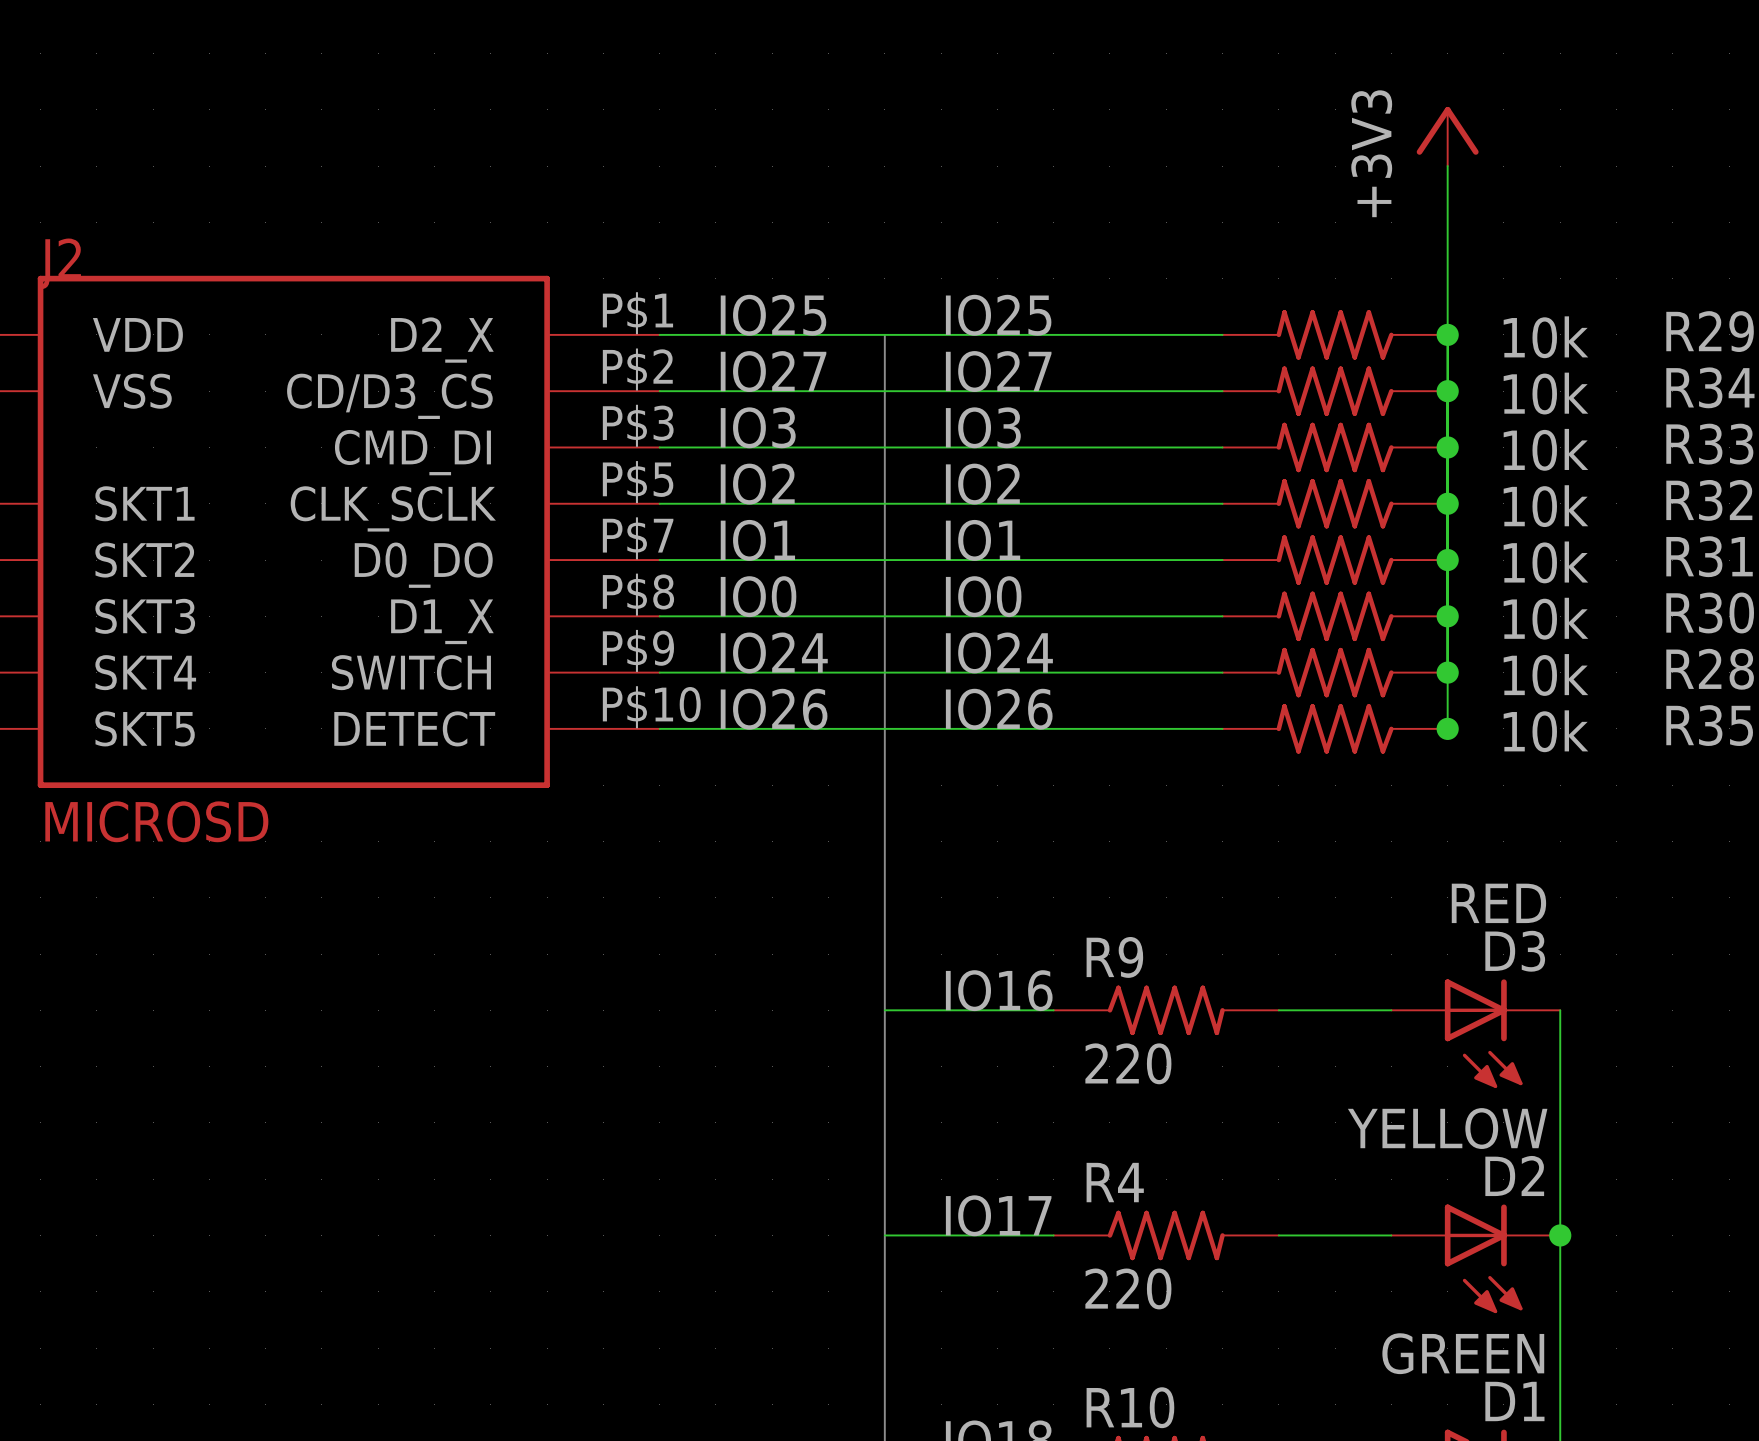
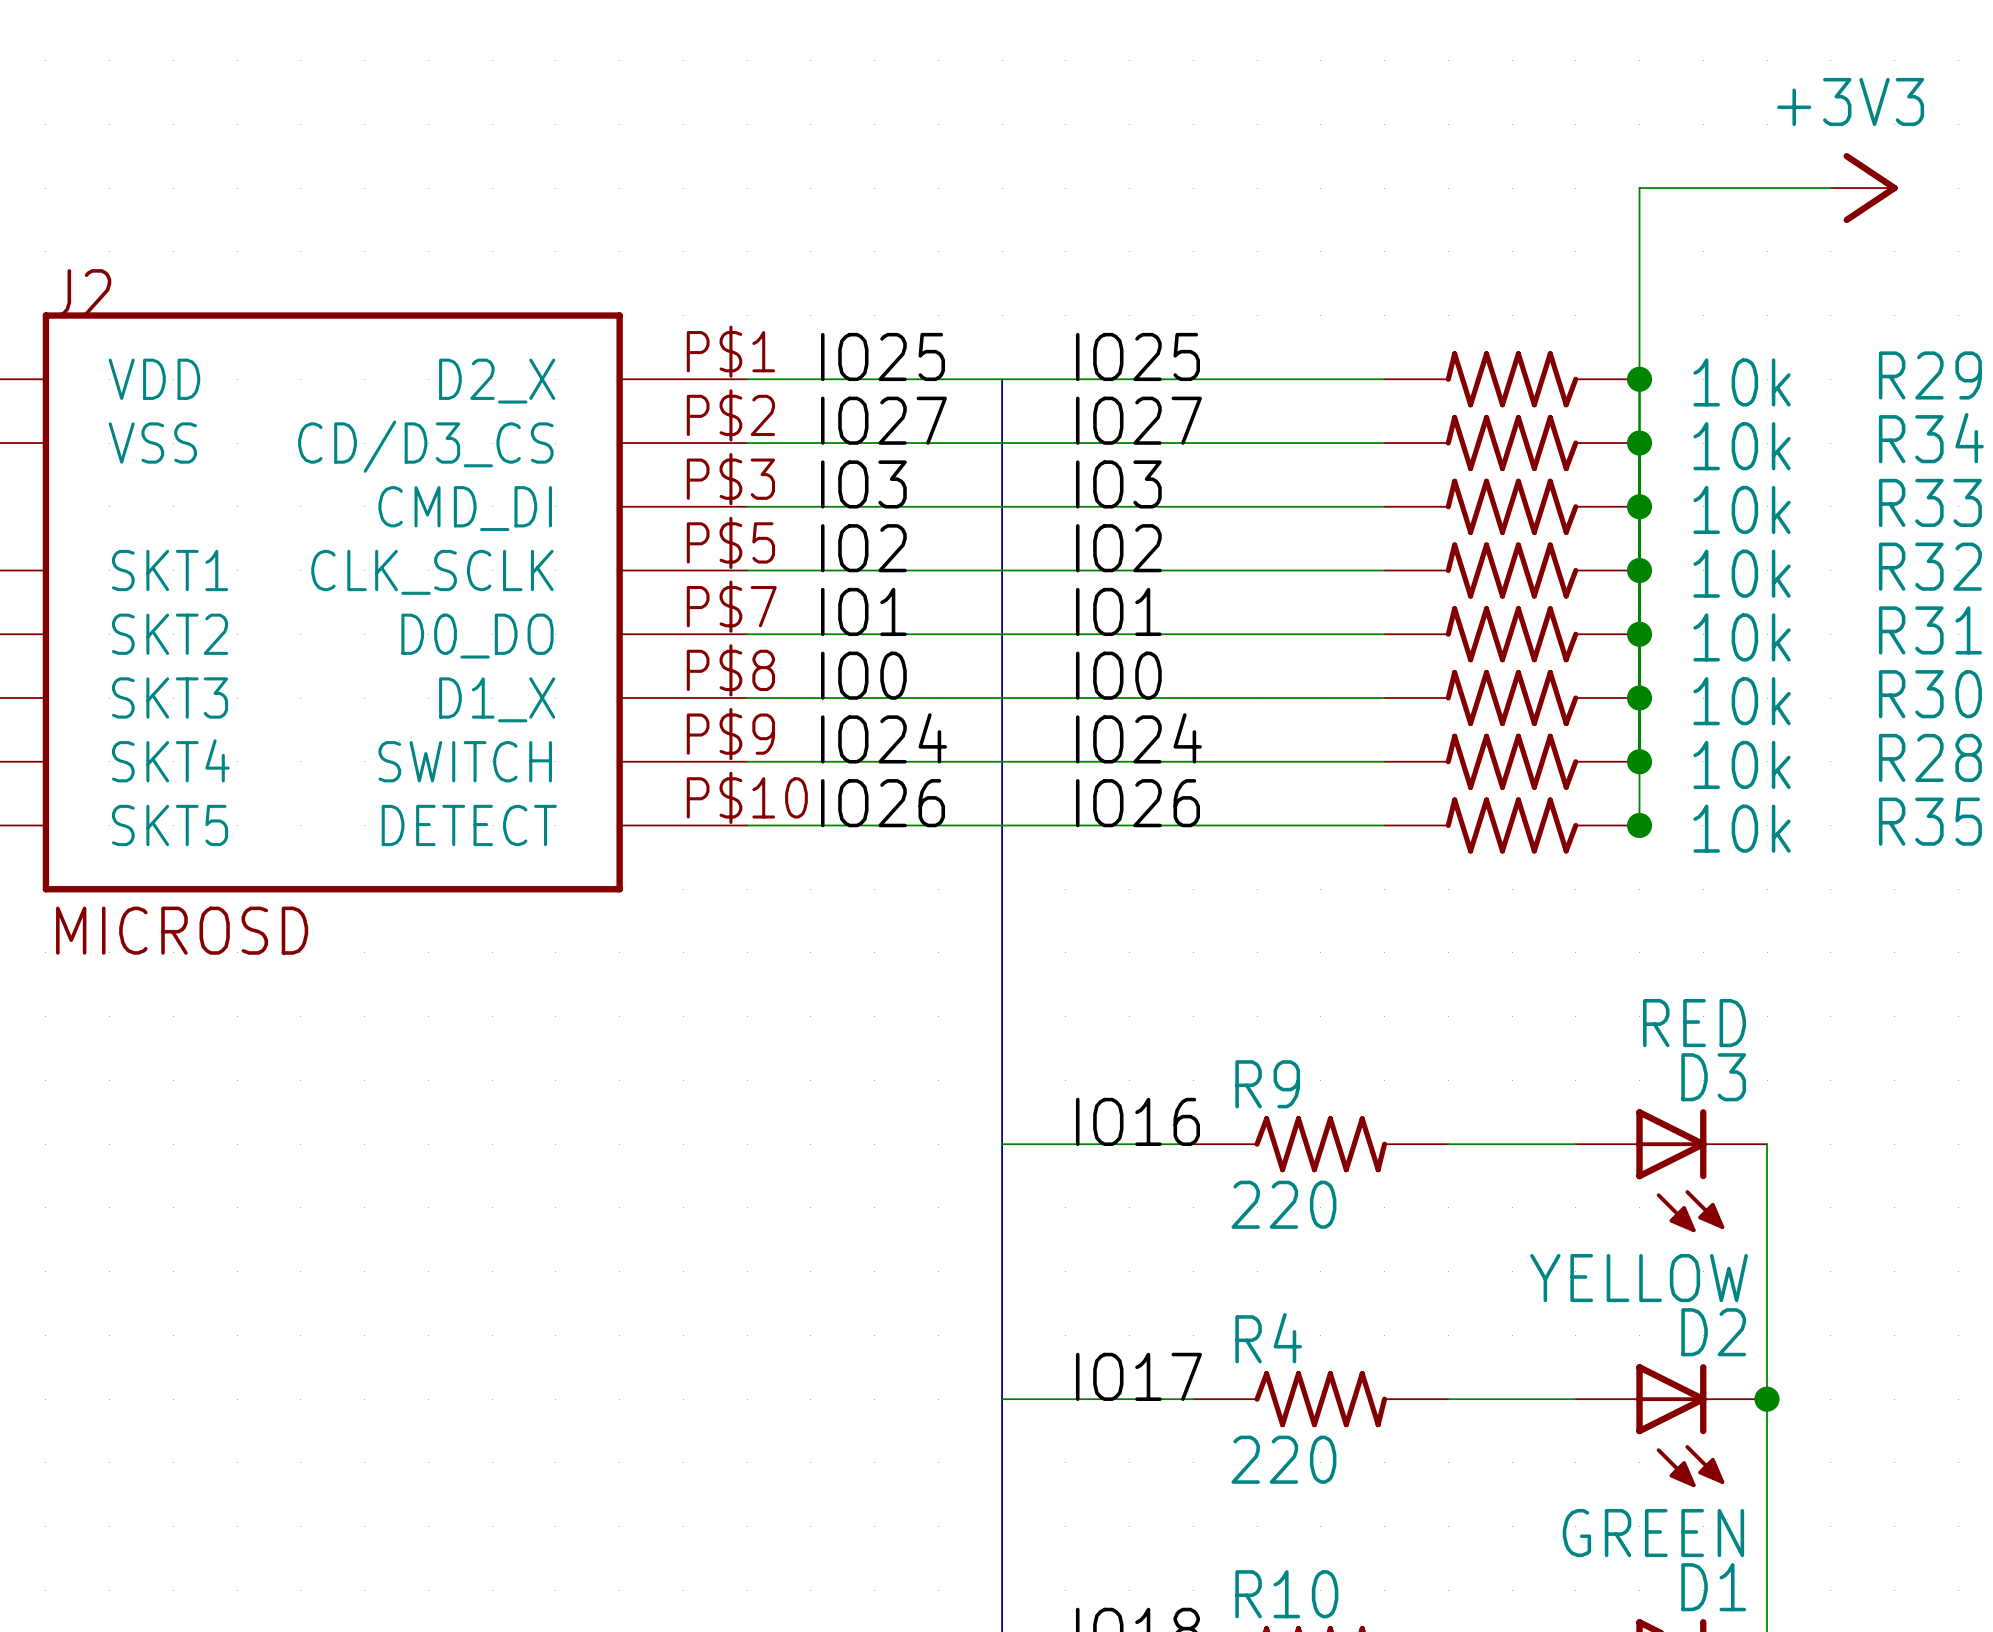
power symbol rotation: 0° (1447, 130) -> 90° clockwise (1870, 188)
power symbol position: +3V3 (1447, 136) -> +3V3 (1864, 188)
wire: none -> (1639, 188) (1830, 188)

